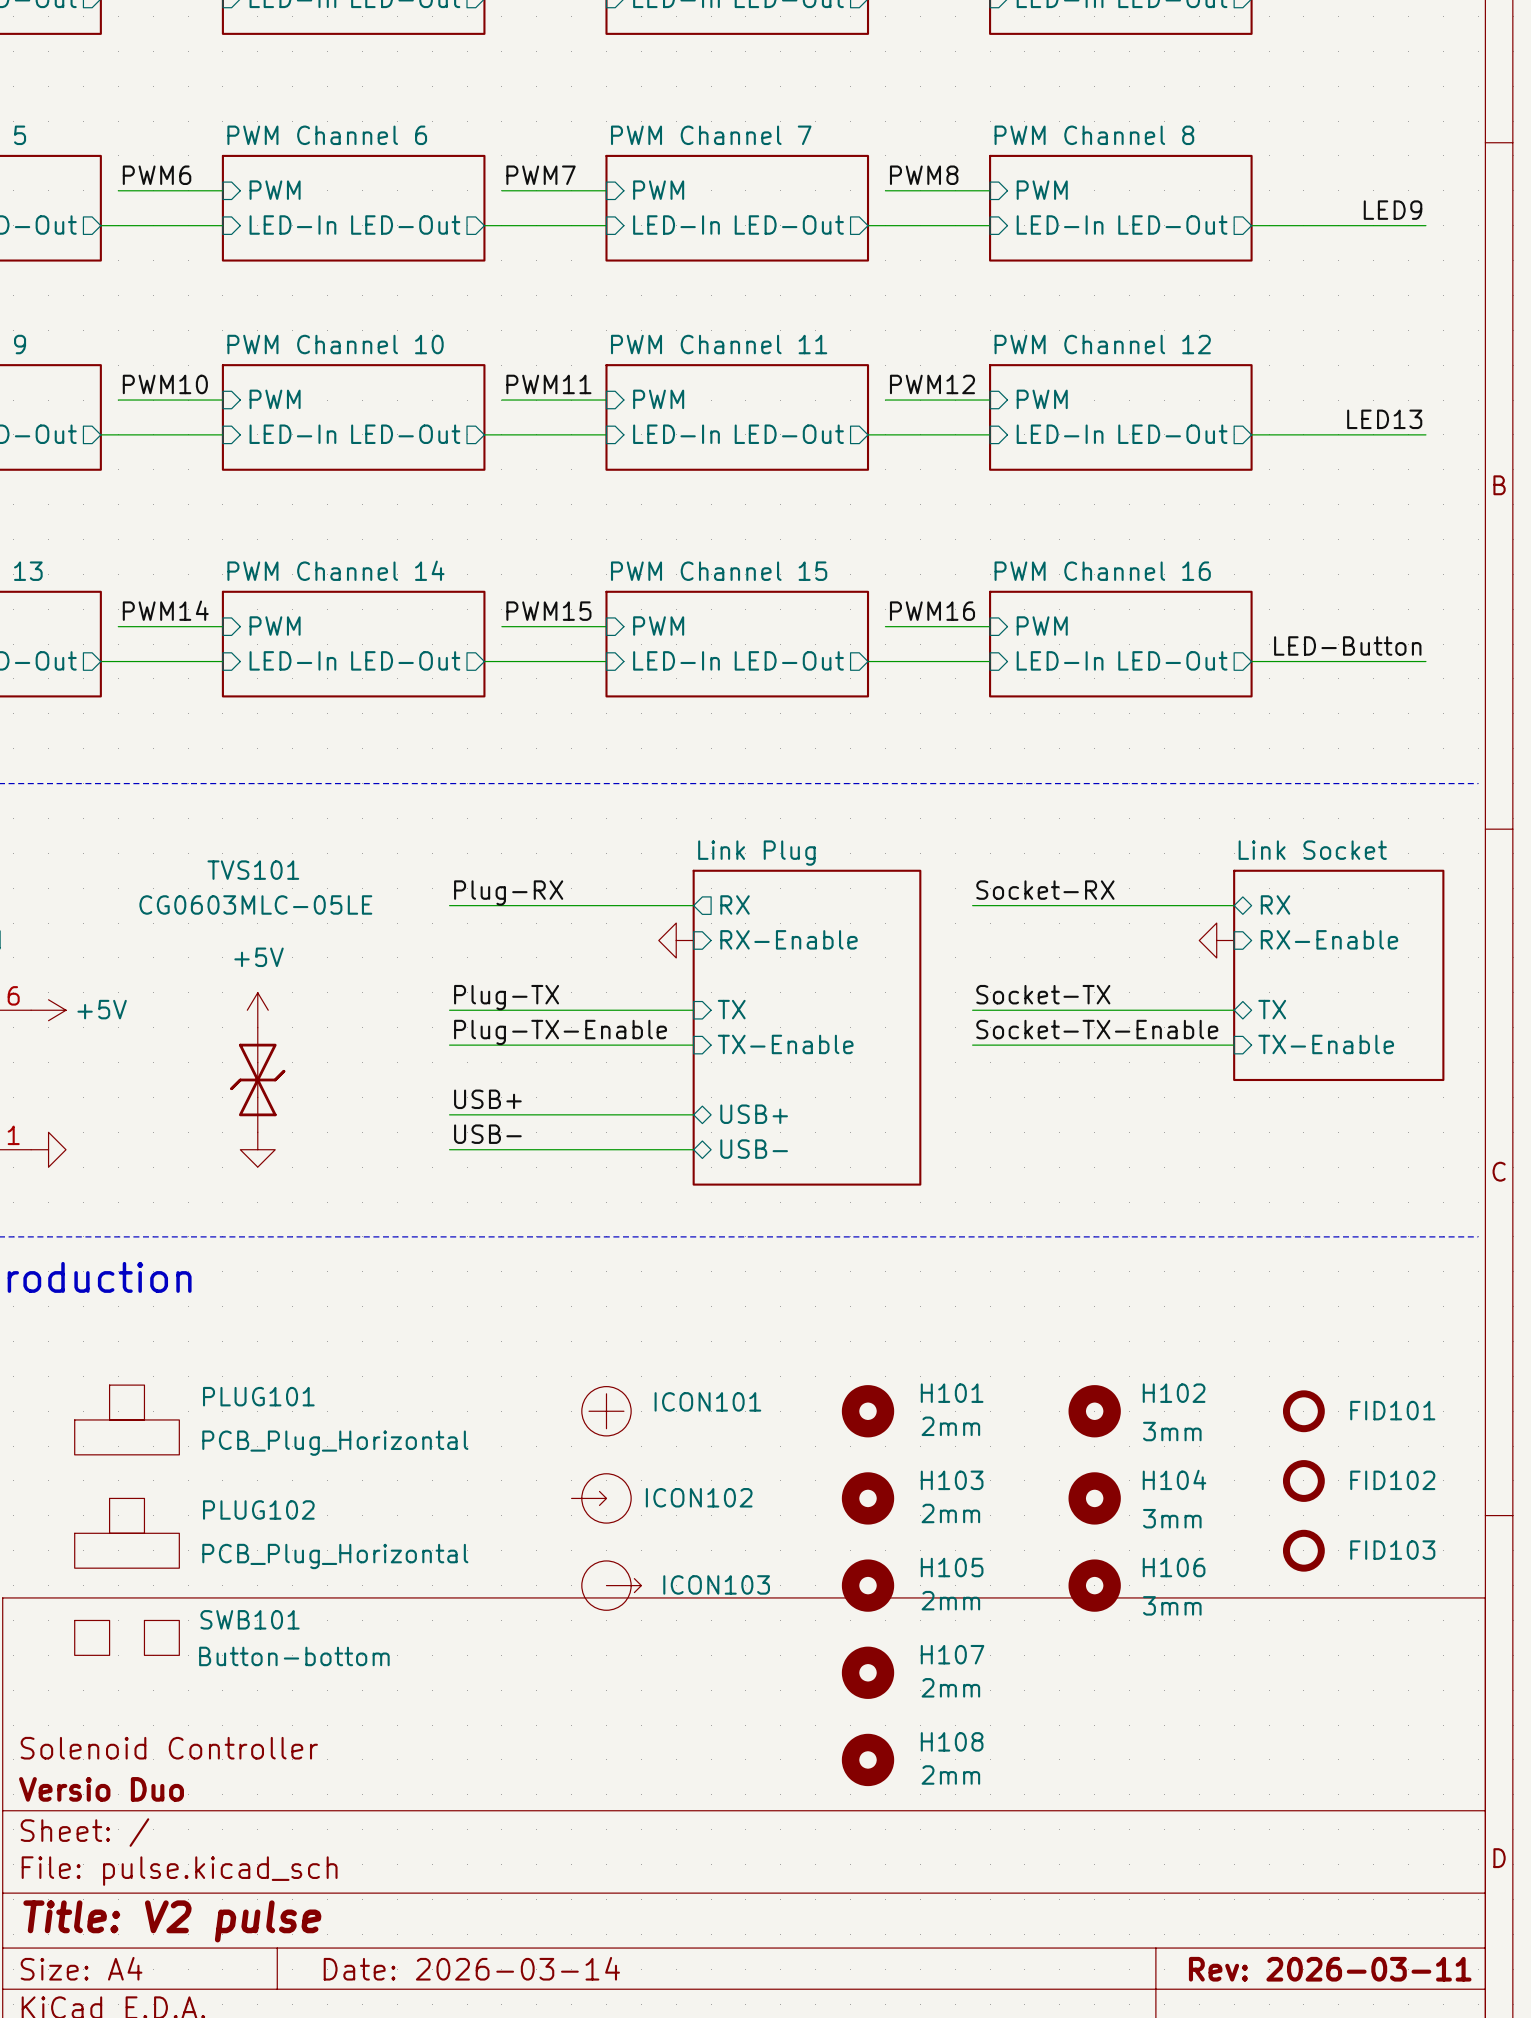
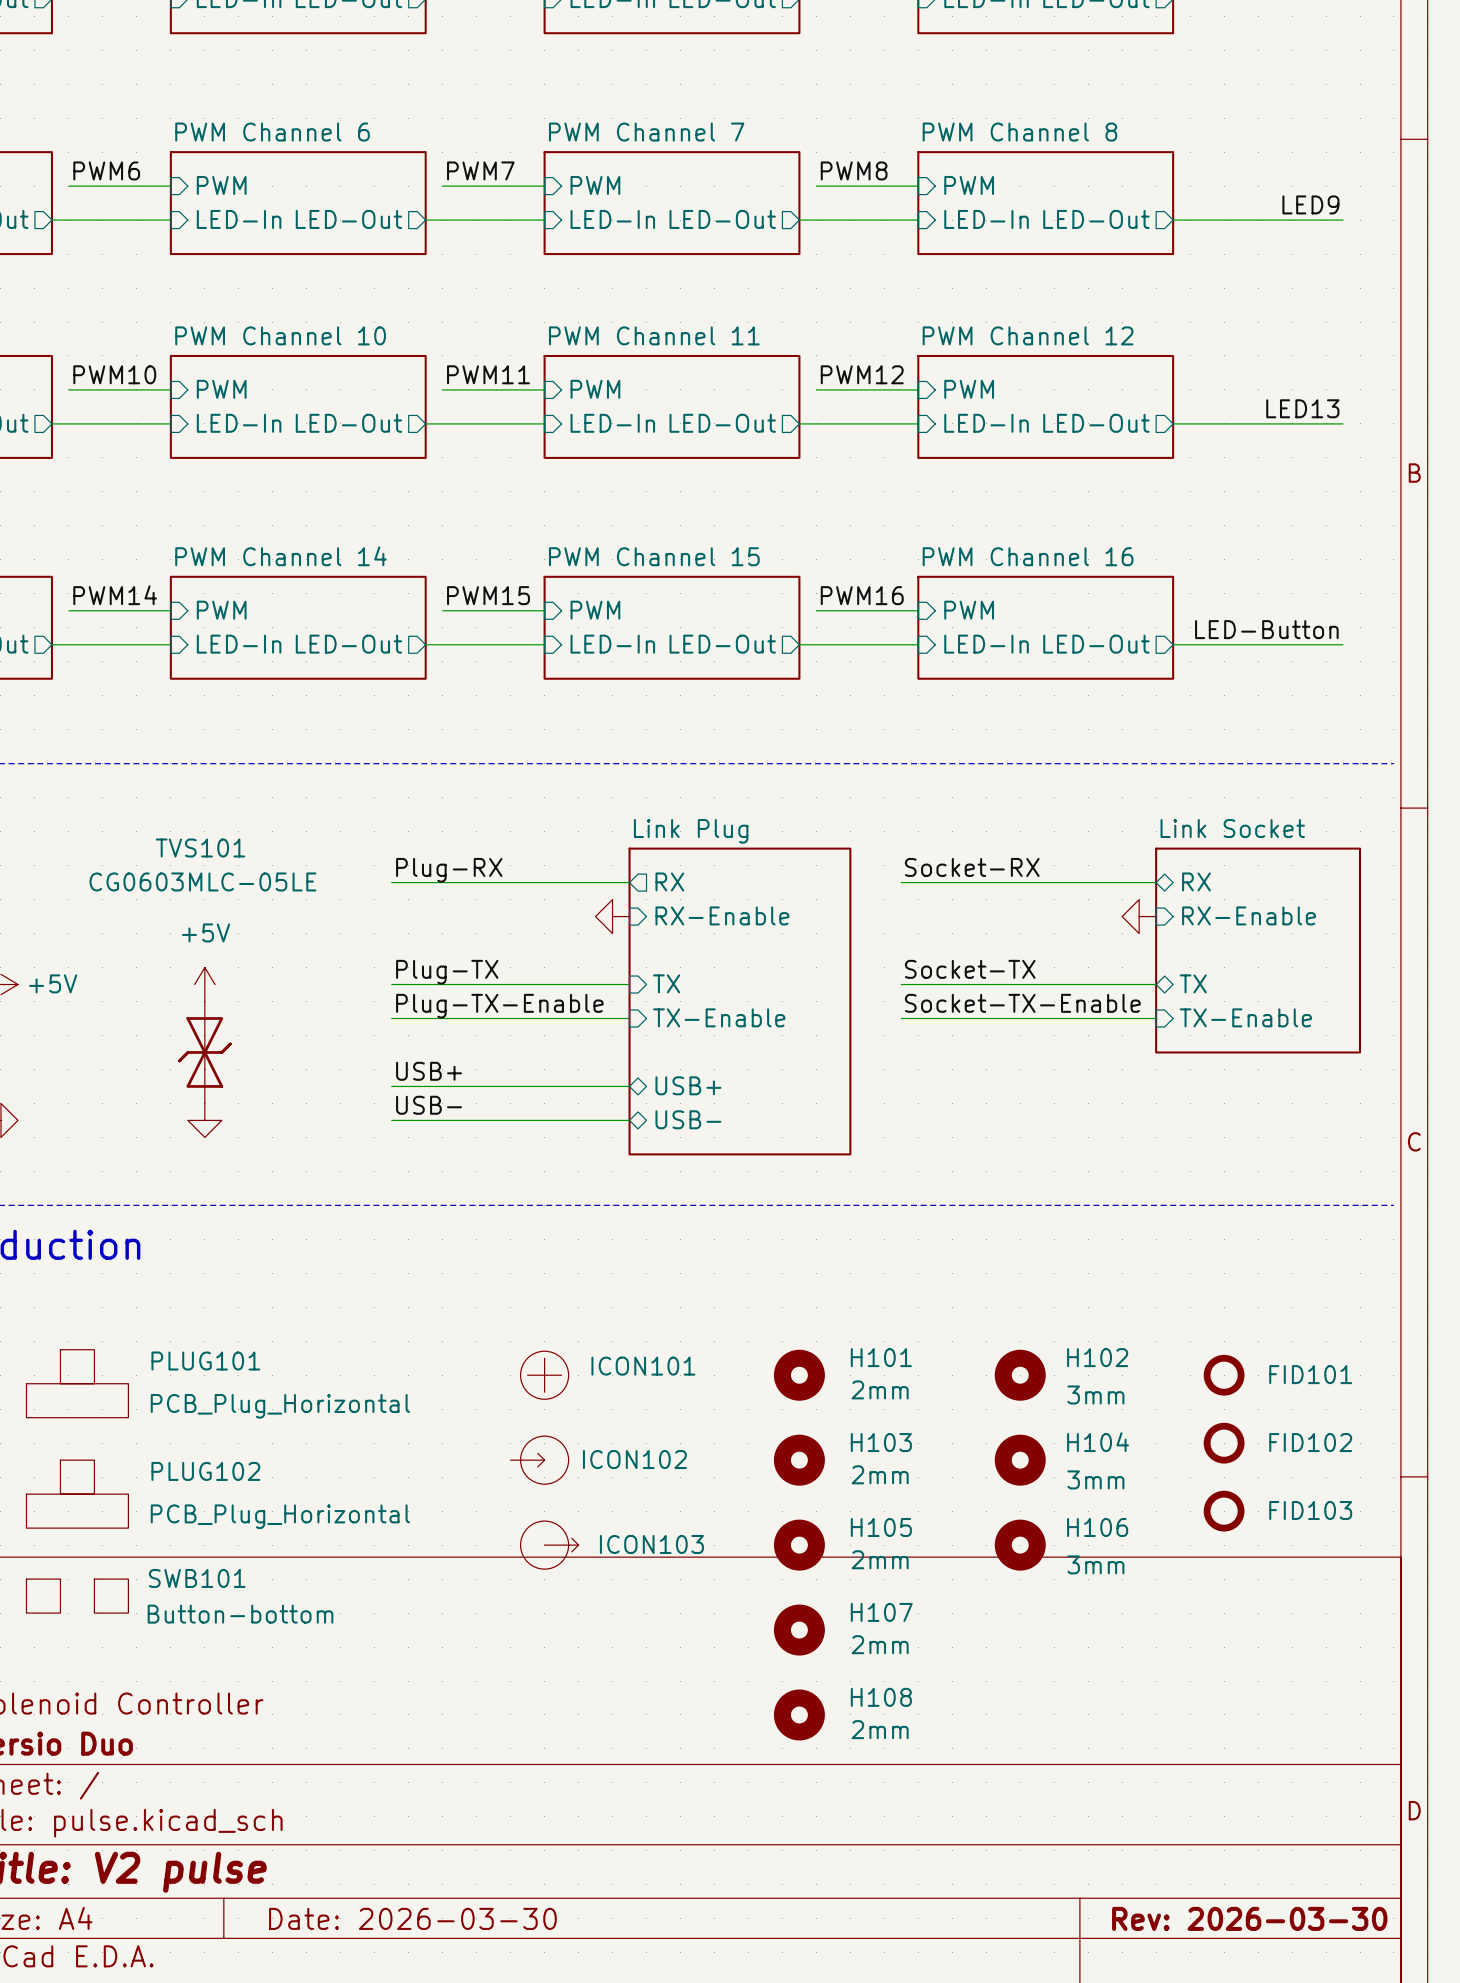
title block: Date: 2026-03-14 (471, 1968) -> Date: 2026-03-30 (412, 1918)
title block: Rev: 2026-03-11 (1330, 1969) -> Rev: 2026-03-30 (1249, 1918)

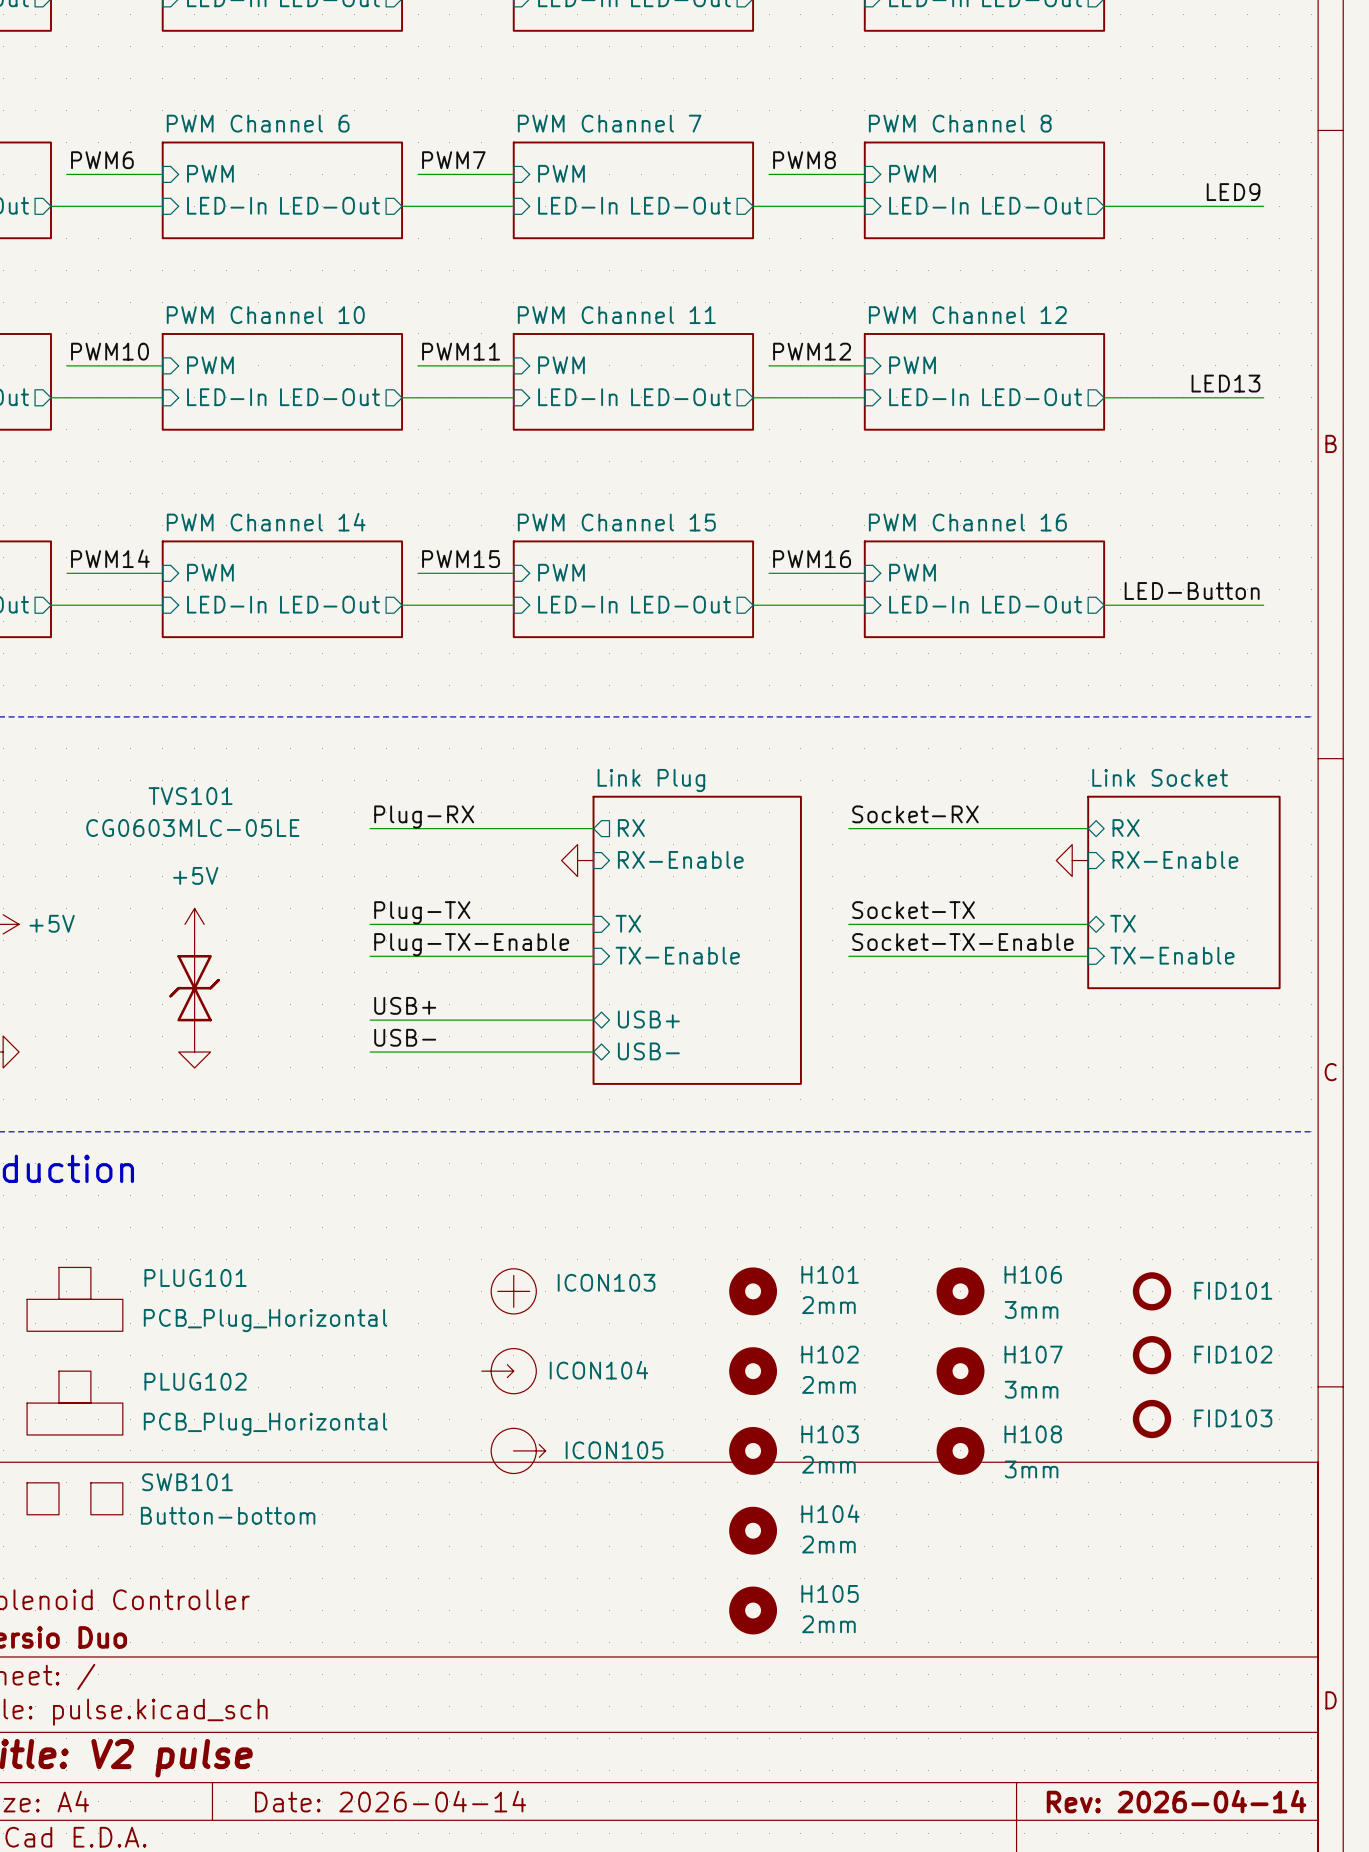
H102 name: H102 (1097, 1357) -> H106 (1033, 1274)
ICON101 name: ICON101 (643, 1366) -> ICON103 (606, 1282)
H103 name: H103 (881, 1442) -> H102 (830, 1354)
H104 name: H104 (1098, 1442) -> H107 (1033, 1354)
ICON102 name: ICON102 (634, 1459) -> ICON104 (598, 1370)
H105 name: H105 (881, 1527) -> H103 (830, 1434)
H106 name: H106 (1097, 1527) -> H108 (1033, 1434)
ICON103 name: ICON103 (651, 1544) -> ICON105 (614, 1450)
H107 name: H107 (881, 1612) -> H104 (830, 1513)
H108 name: H108 (881, 1697) -> H105 (830, 1593)
title block: Date: 2026-03-30 (412, 1918) -> Date: 2026-04-14 (390, 1801)
title block: Rev: 2026-03-30 (1249, 1918) -> Rev: 2026-04-14 (1176, 1801)

